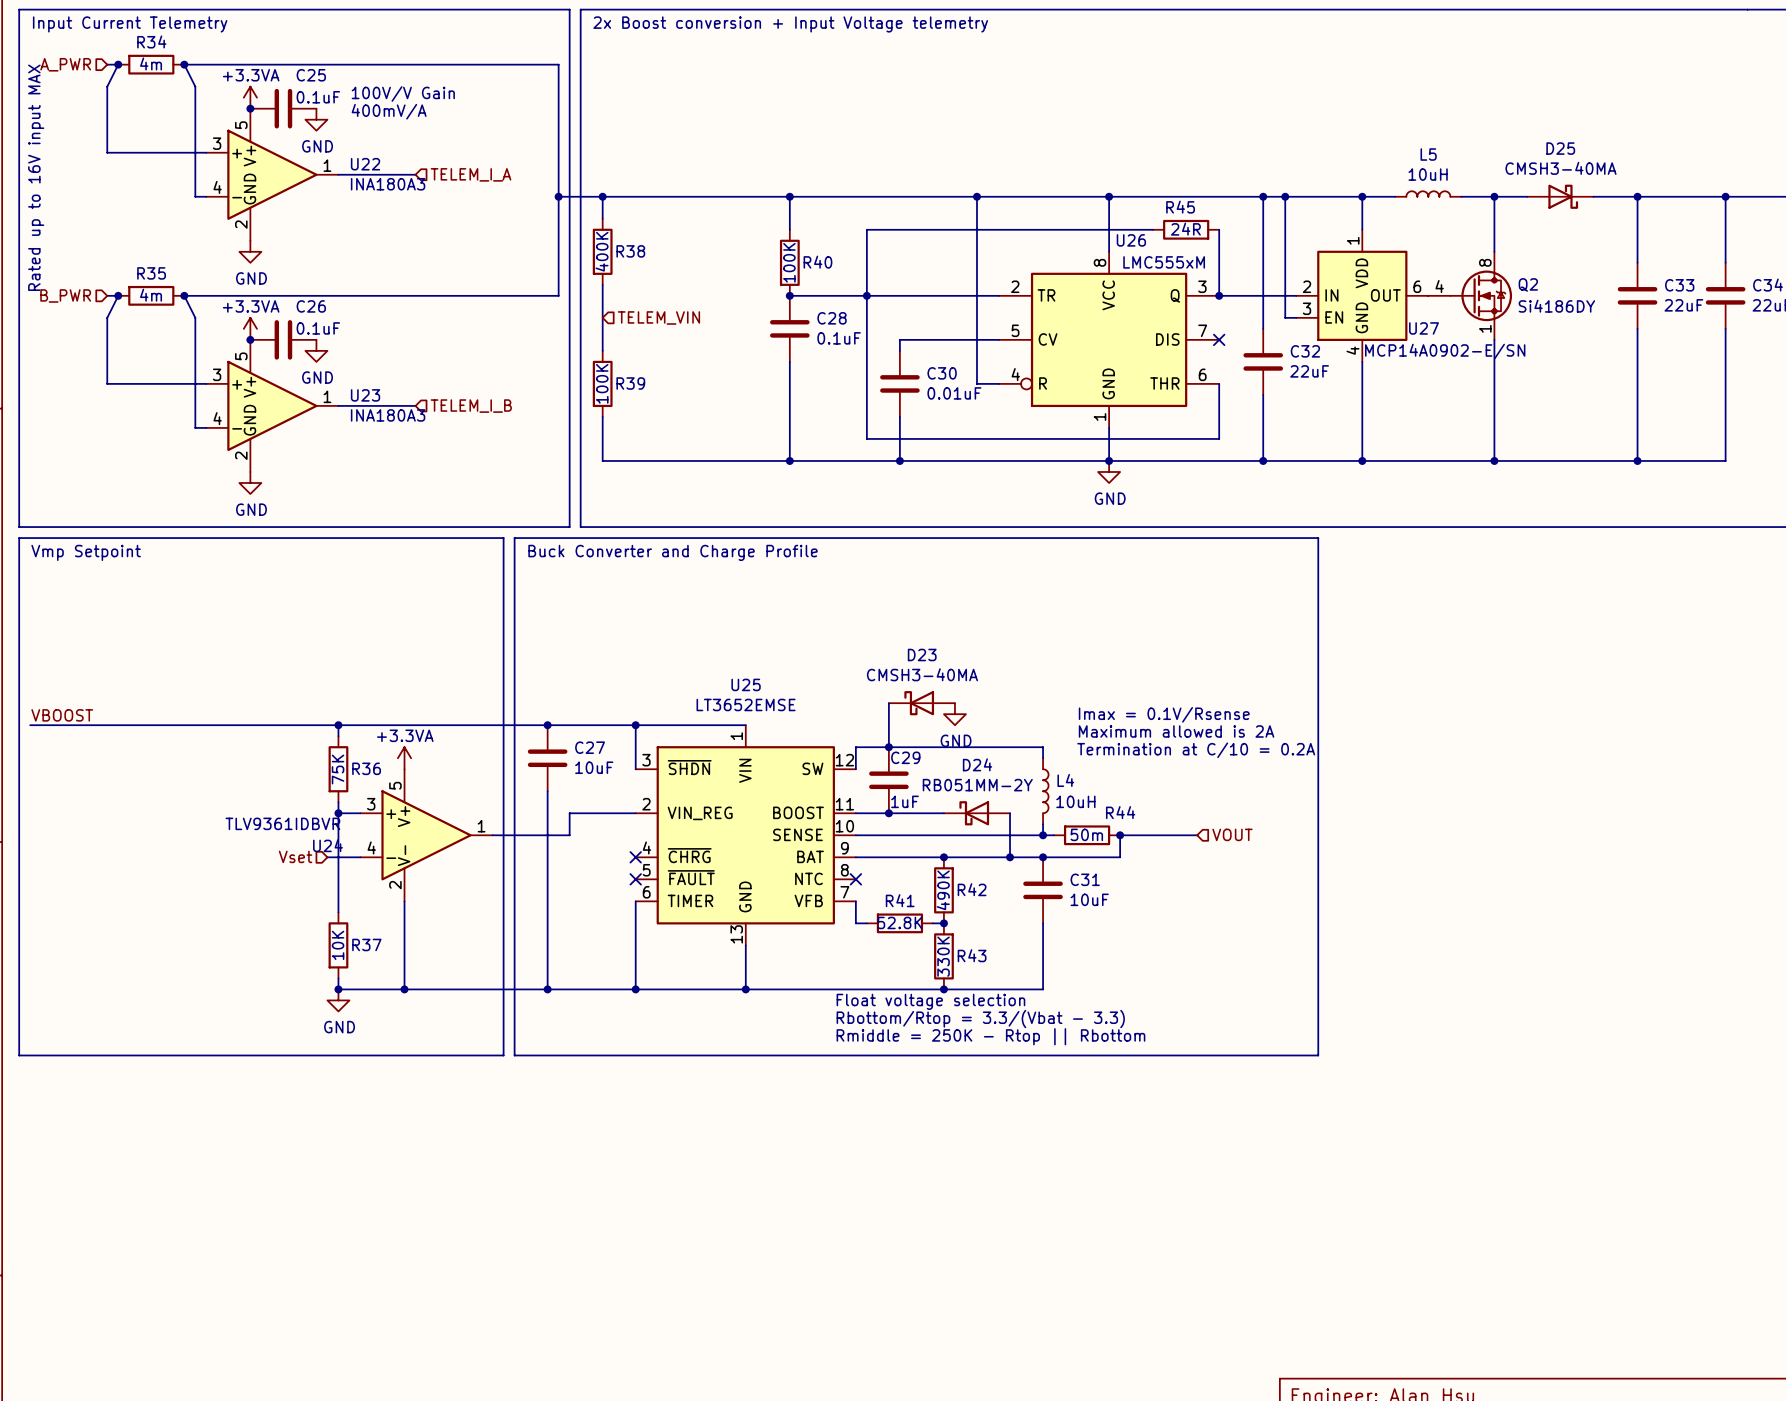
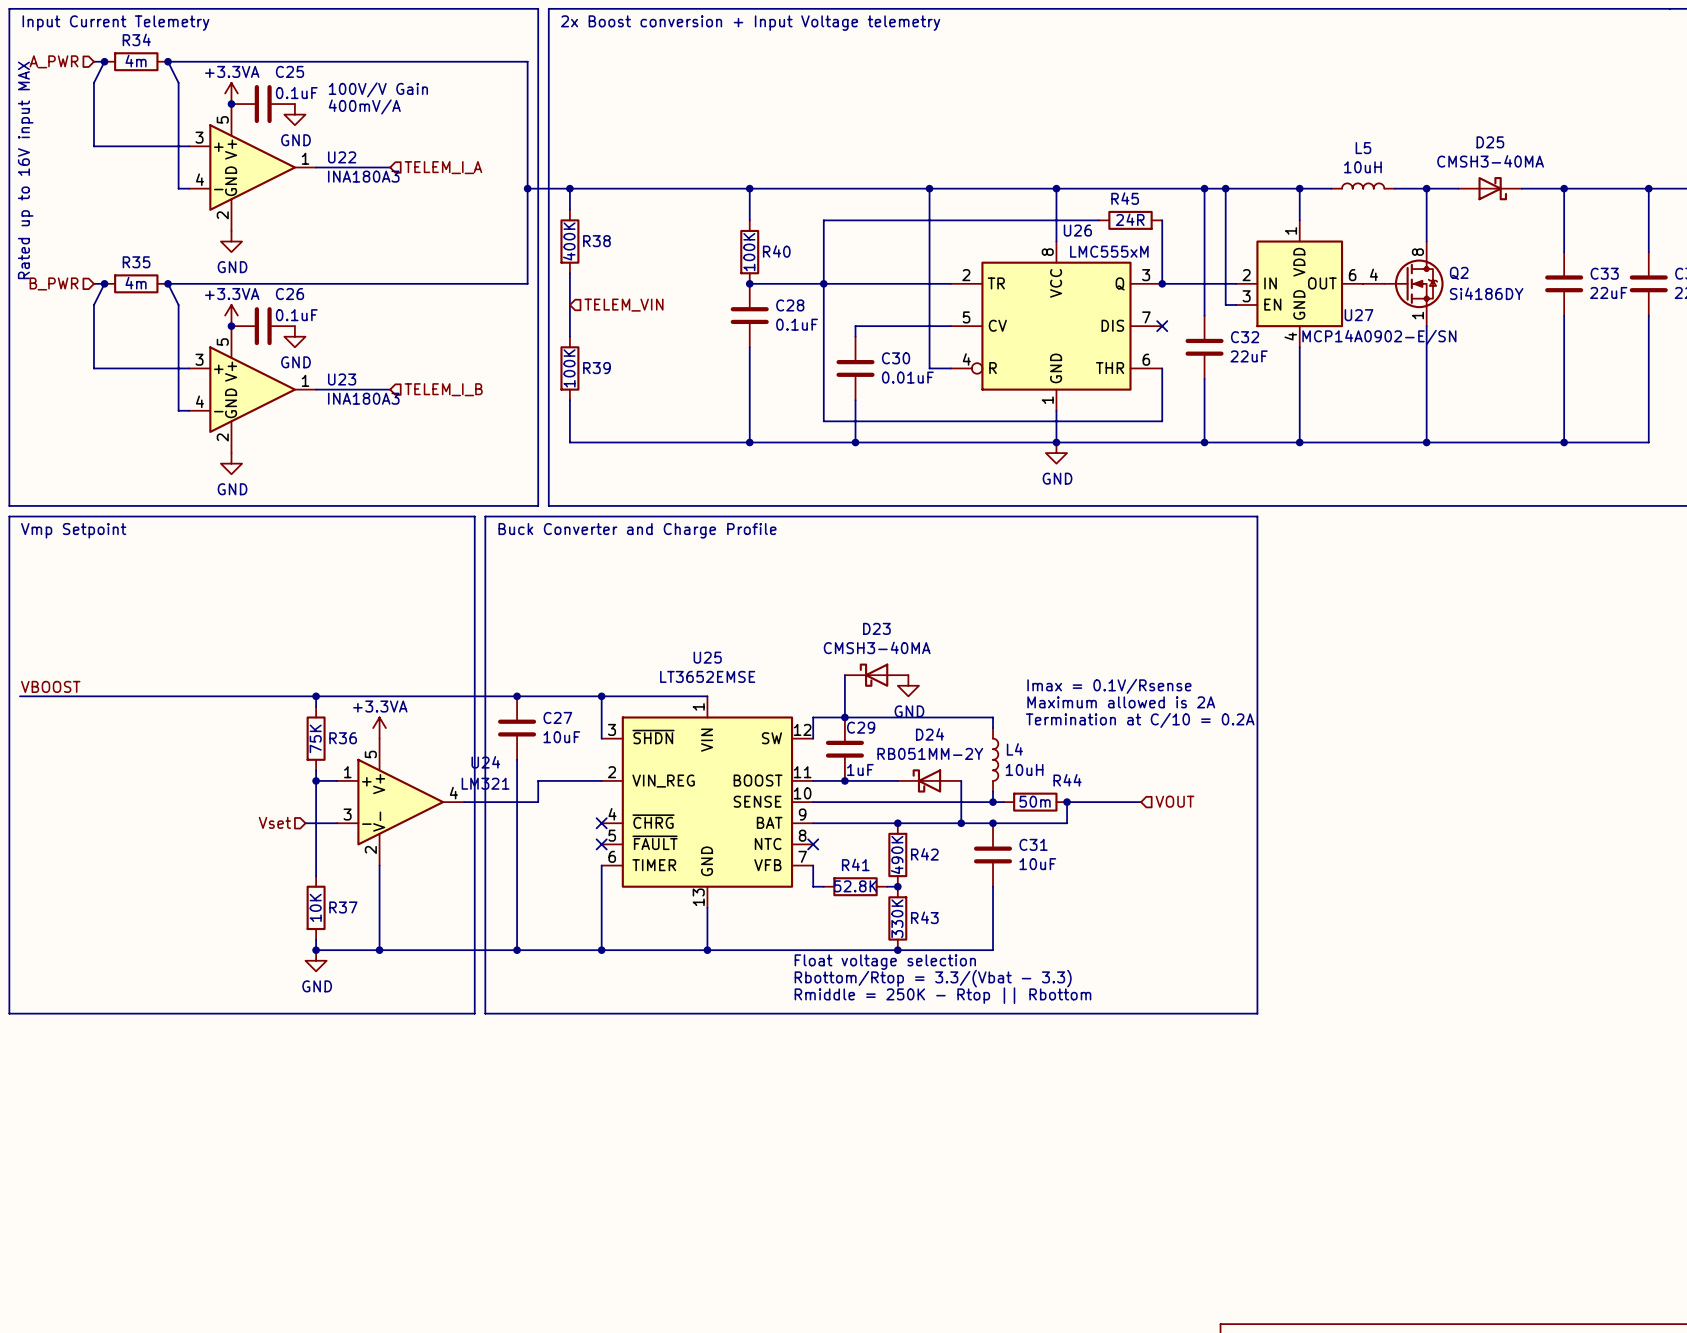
U24 pin number: 3 (371, 804) -> 1 (347, 772)
U24 value: TLV9361IDBVR (282, 823) -> LM321 (485, 783)
U24 pin number: 1 (481, 826) -> 4 (453, 793)
U24 name position: U24 (327, 845) -> U24 (485, 762)
U24 pin number: 4 (371, 847) -> 3 (347, 814)

